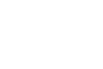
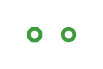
part: none -> (51, 34)

